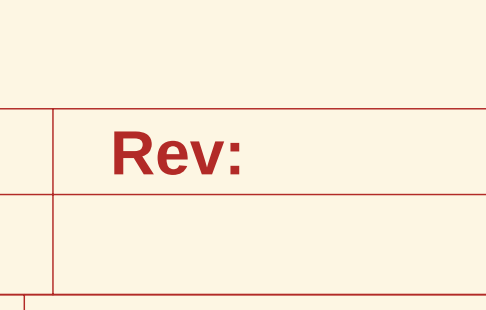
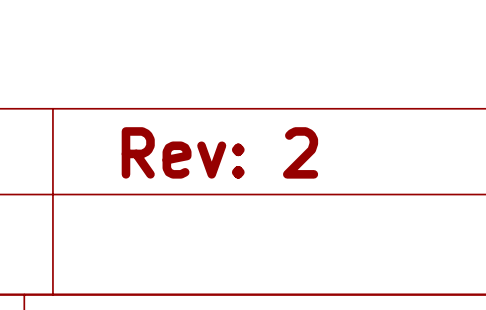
title block: Rev: (176, 153) -> Rev: 2 (219, 152)

